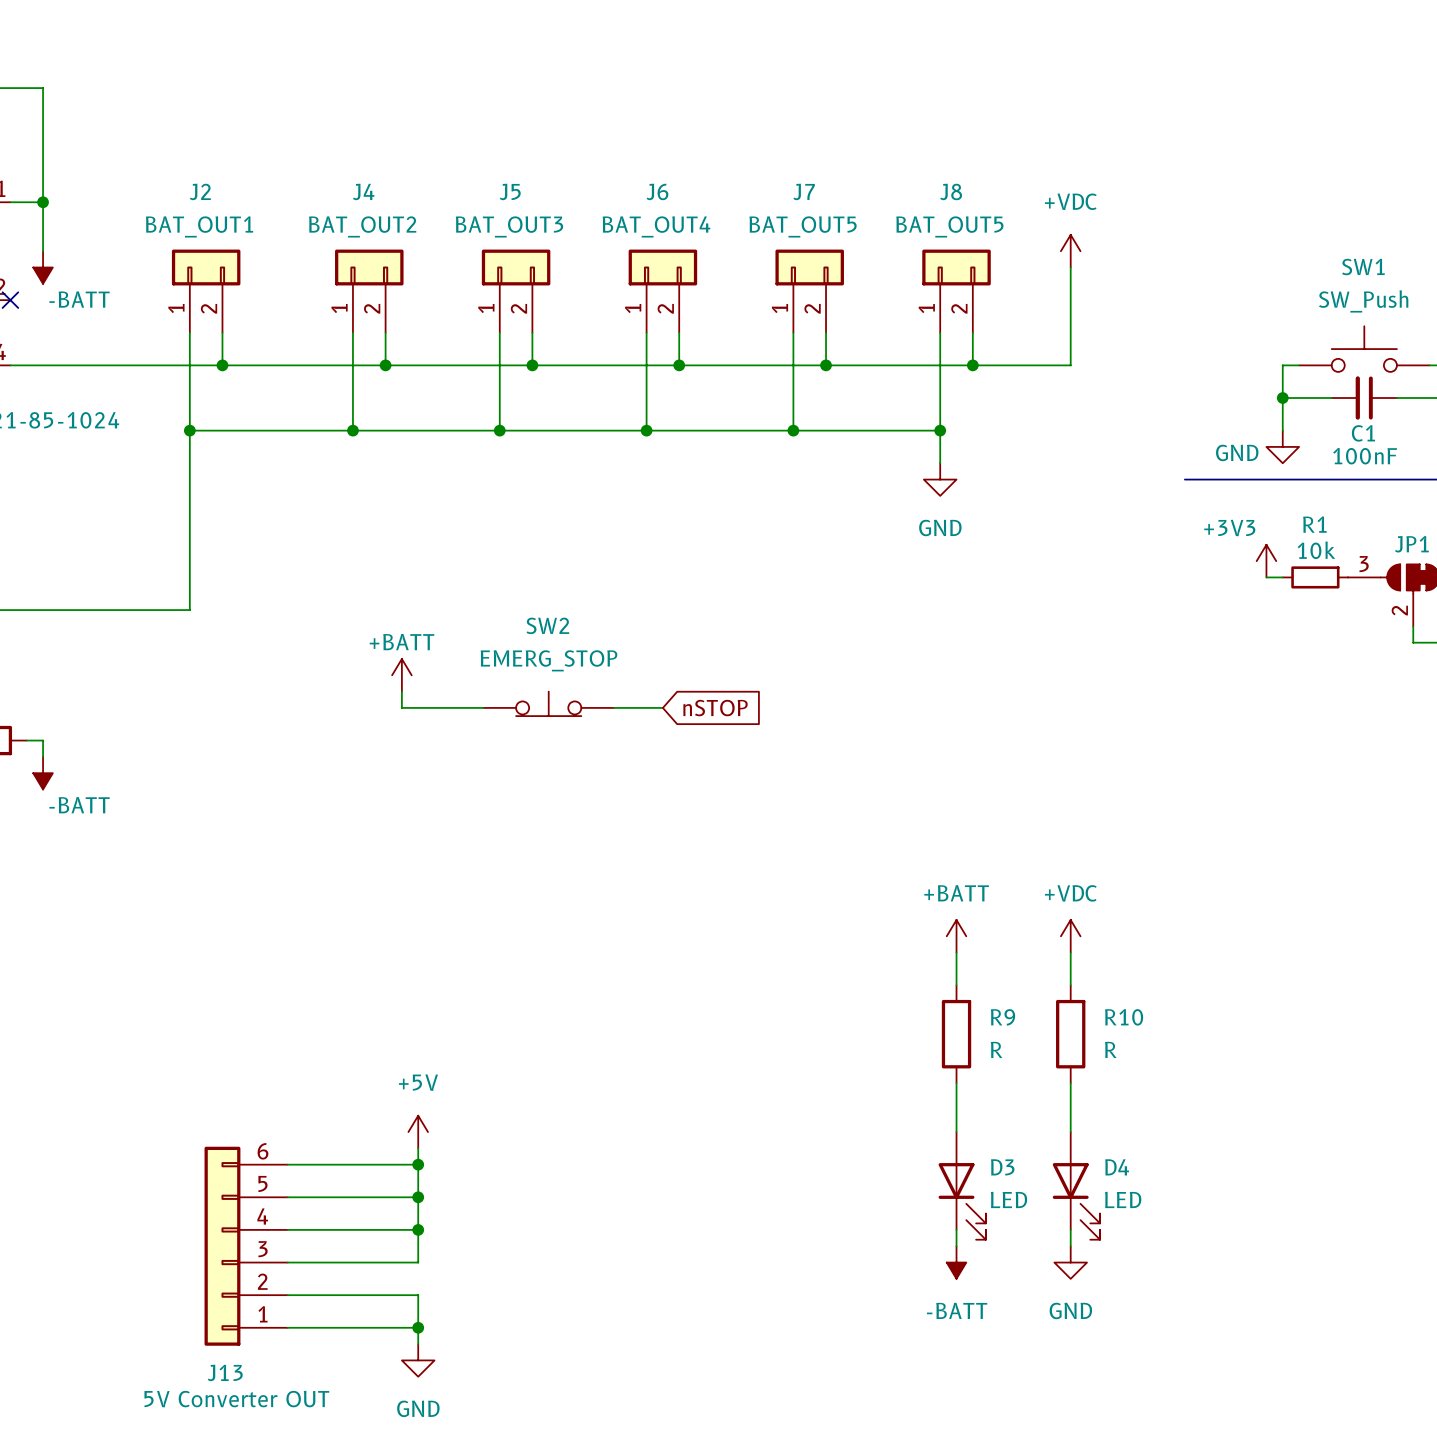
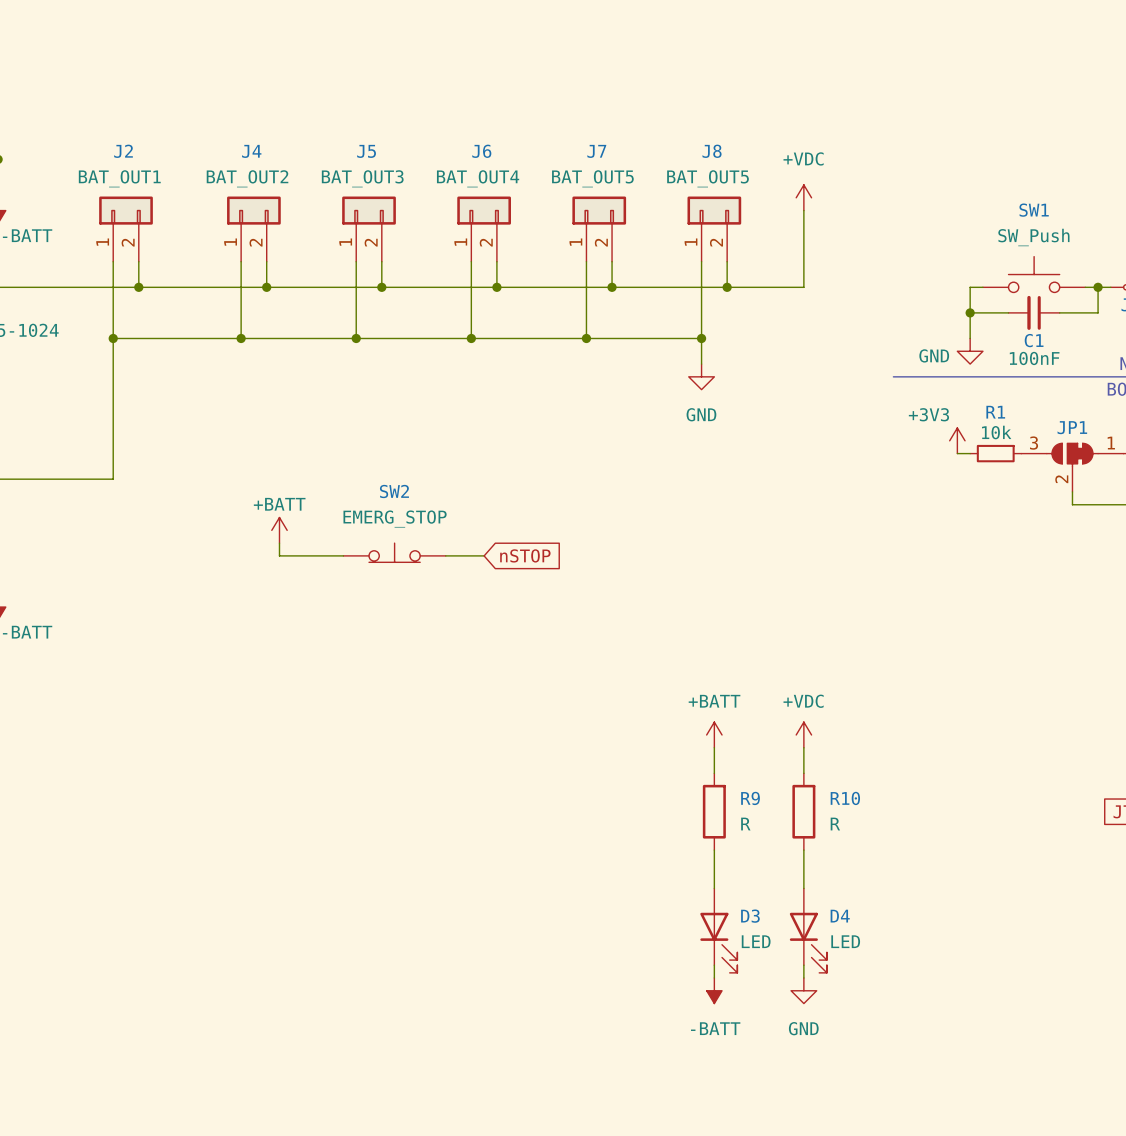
power symbol: +5V (418, 1132) -> none
wire: (418, 1148) (418, 1262) (287, 1262) -> none
wire: (287, 1164) (418, 1164) -> none
junction: (418, 1164) -> none
wire: (287, 1197) (418, 1197) -> none
junction: (418, 1197) -> none
wire: (287, 1229) (418, 1229) -> none
junction: (418, 1229) -> none
J13: 5V Converter OUT (246, 1246) -> none
wire: (287, 1295) (418, 1295) (418, 1344) -> none
wire: (287, 1327) (418, 1327) -> none
junction: (418, 1327) -> none
power symbol: GND (418, 1360) -> none

